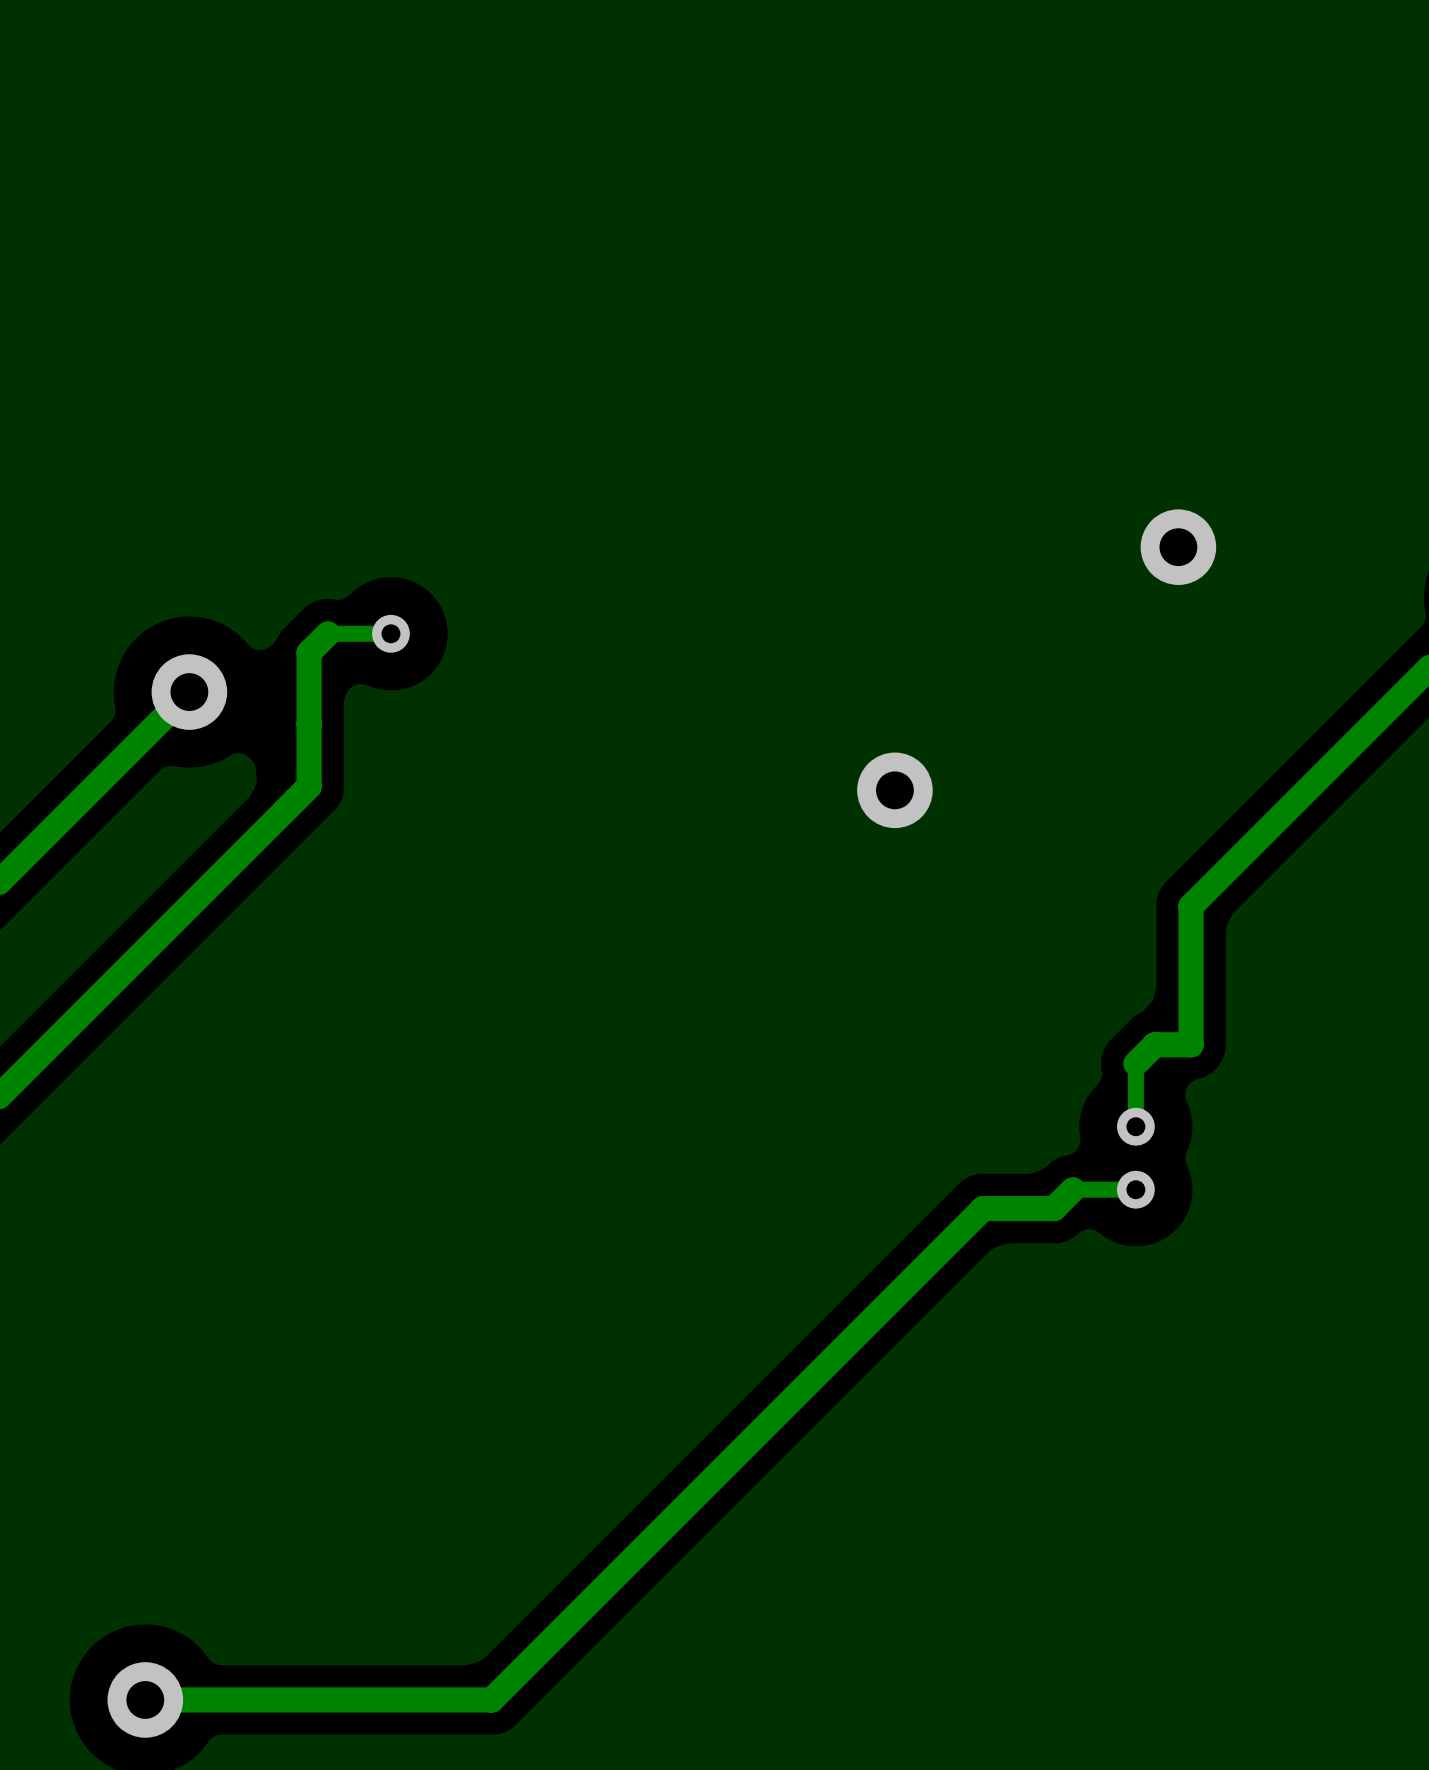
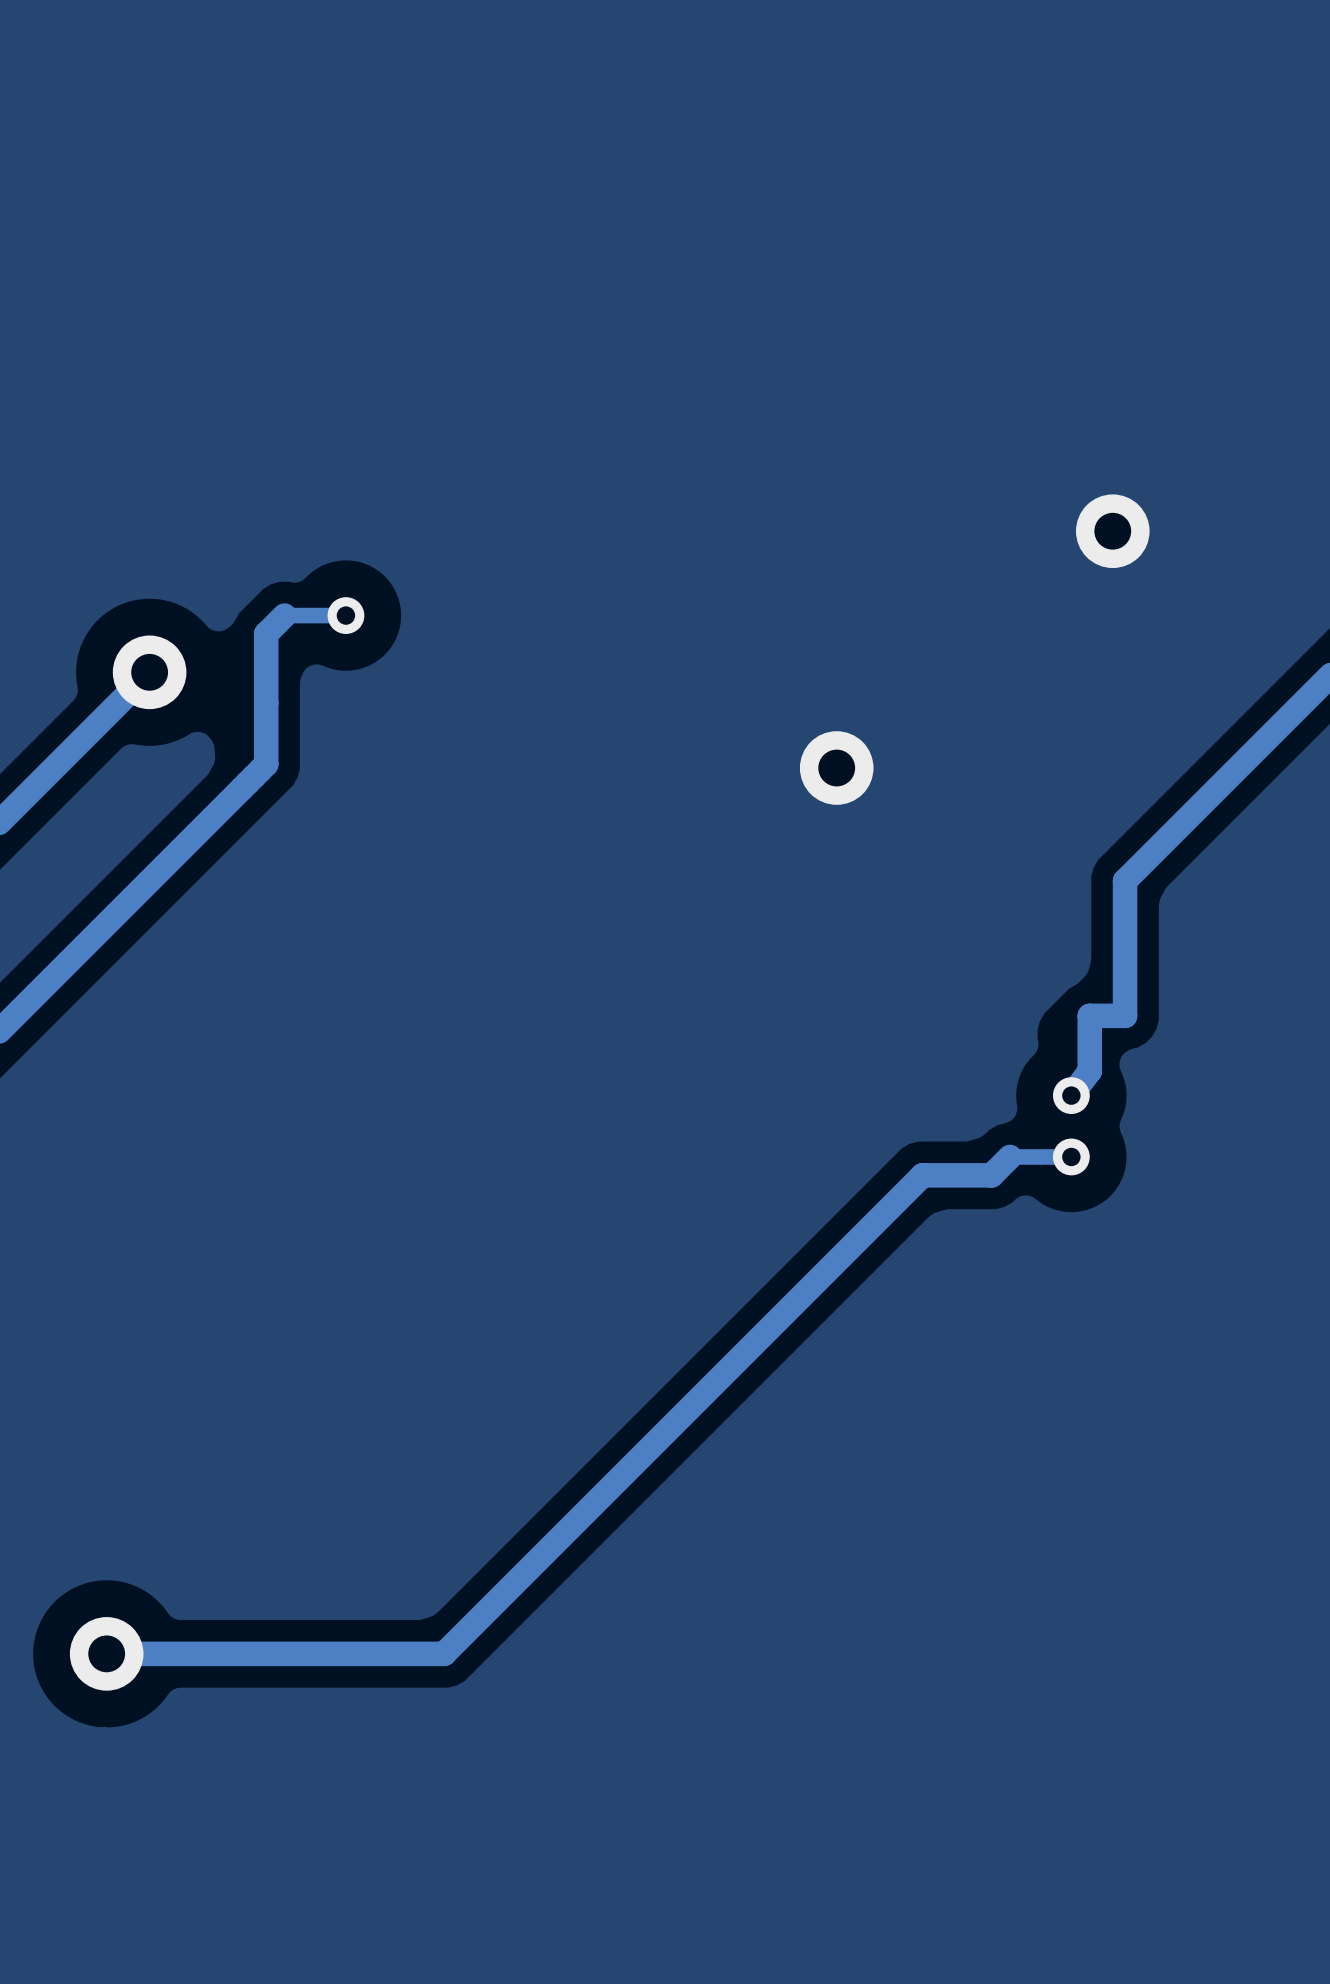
track: (1154, 1044) (1135, 1063) (1135, 1126) -> (1089, 1015) (1089, 1071) (1071, 1095)

